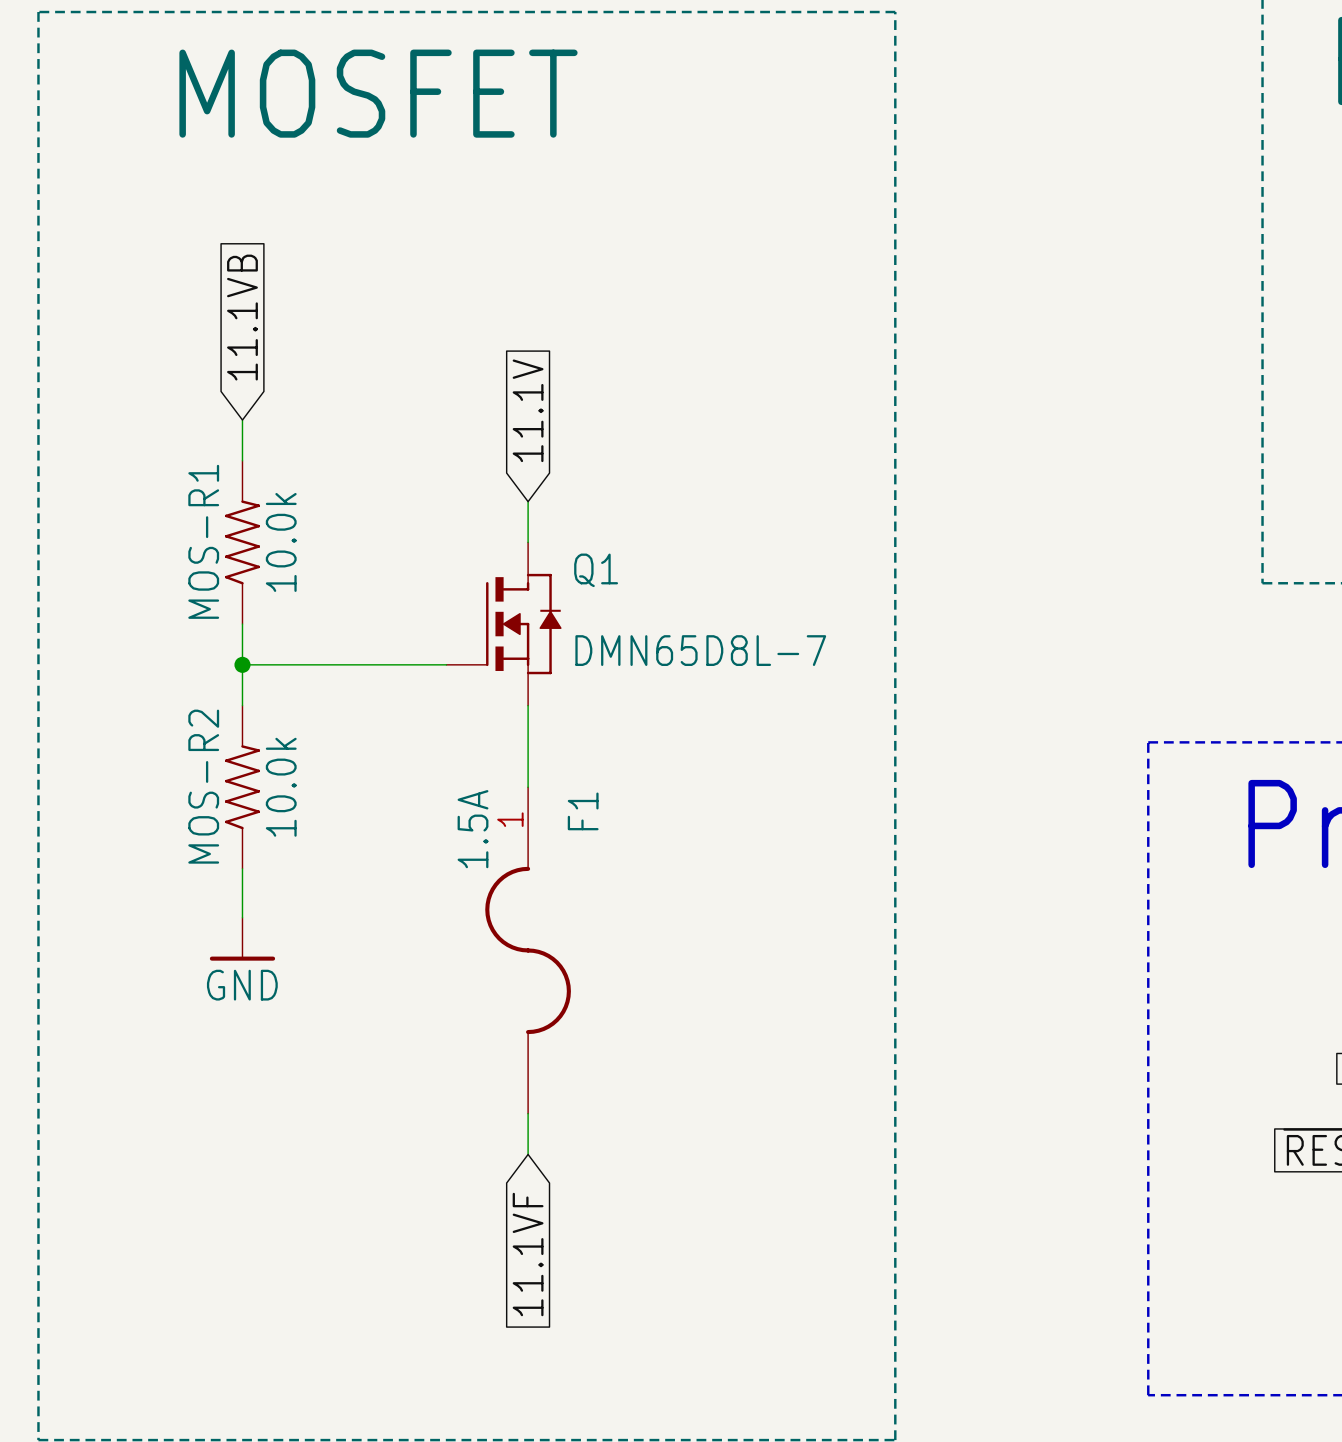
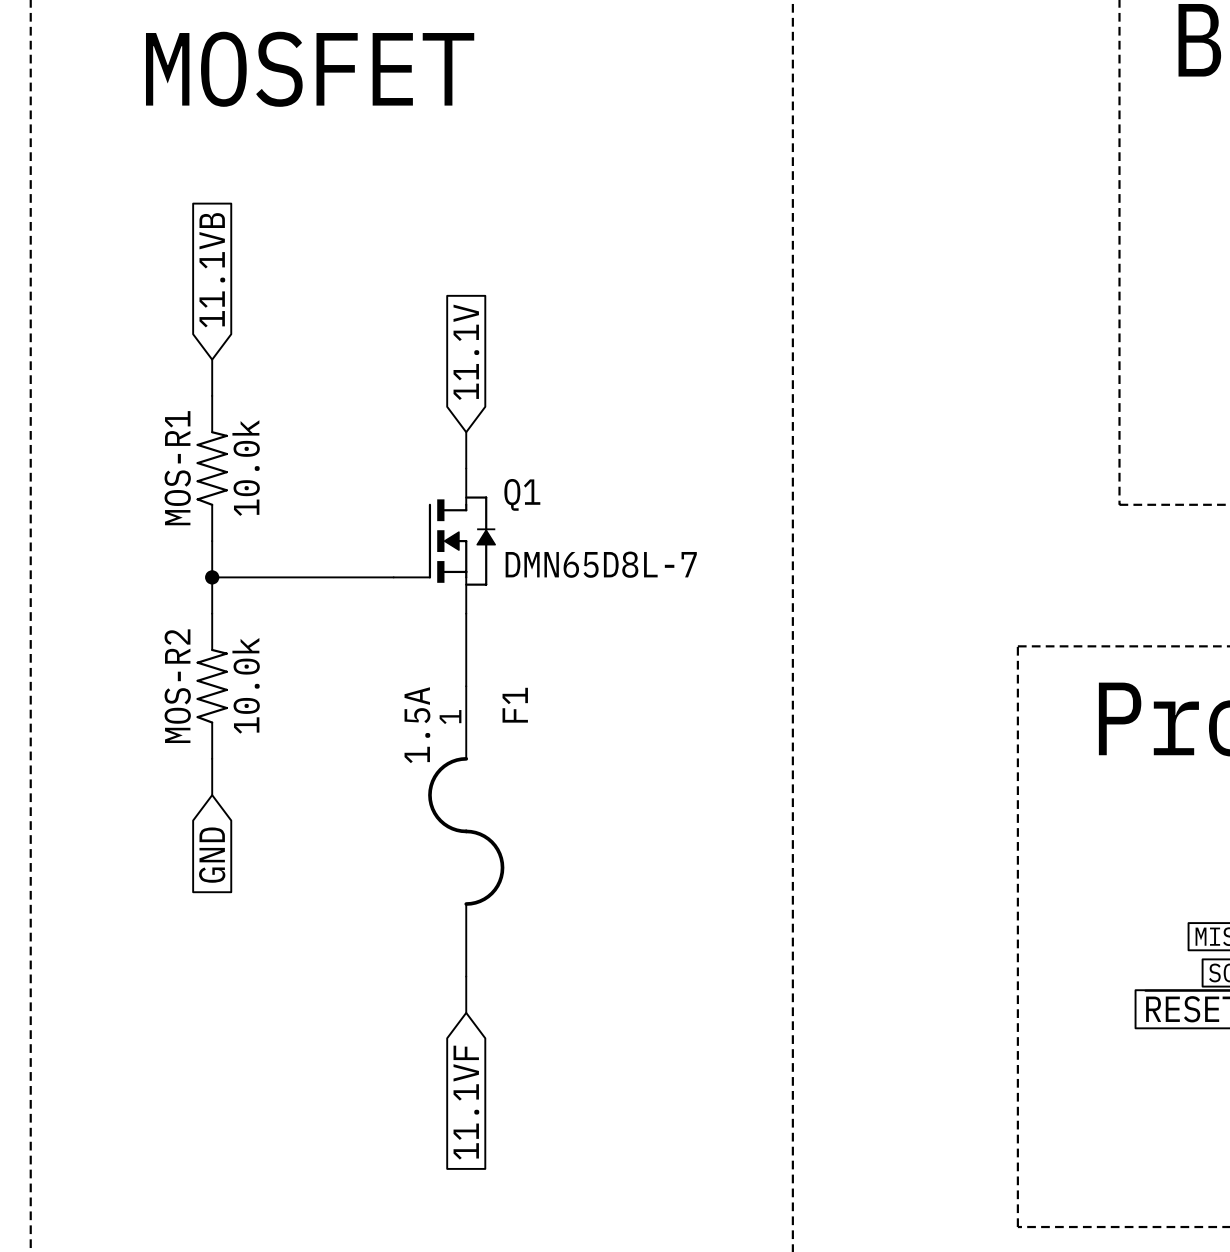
wire: (242, 909) (242, 917) -> none
power symbol: GND (242, 939) -> none
global label: none -> GND (212, 855)

